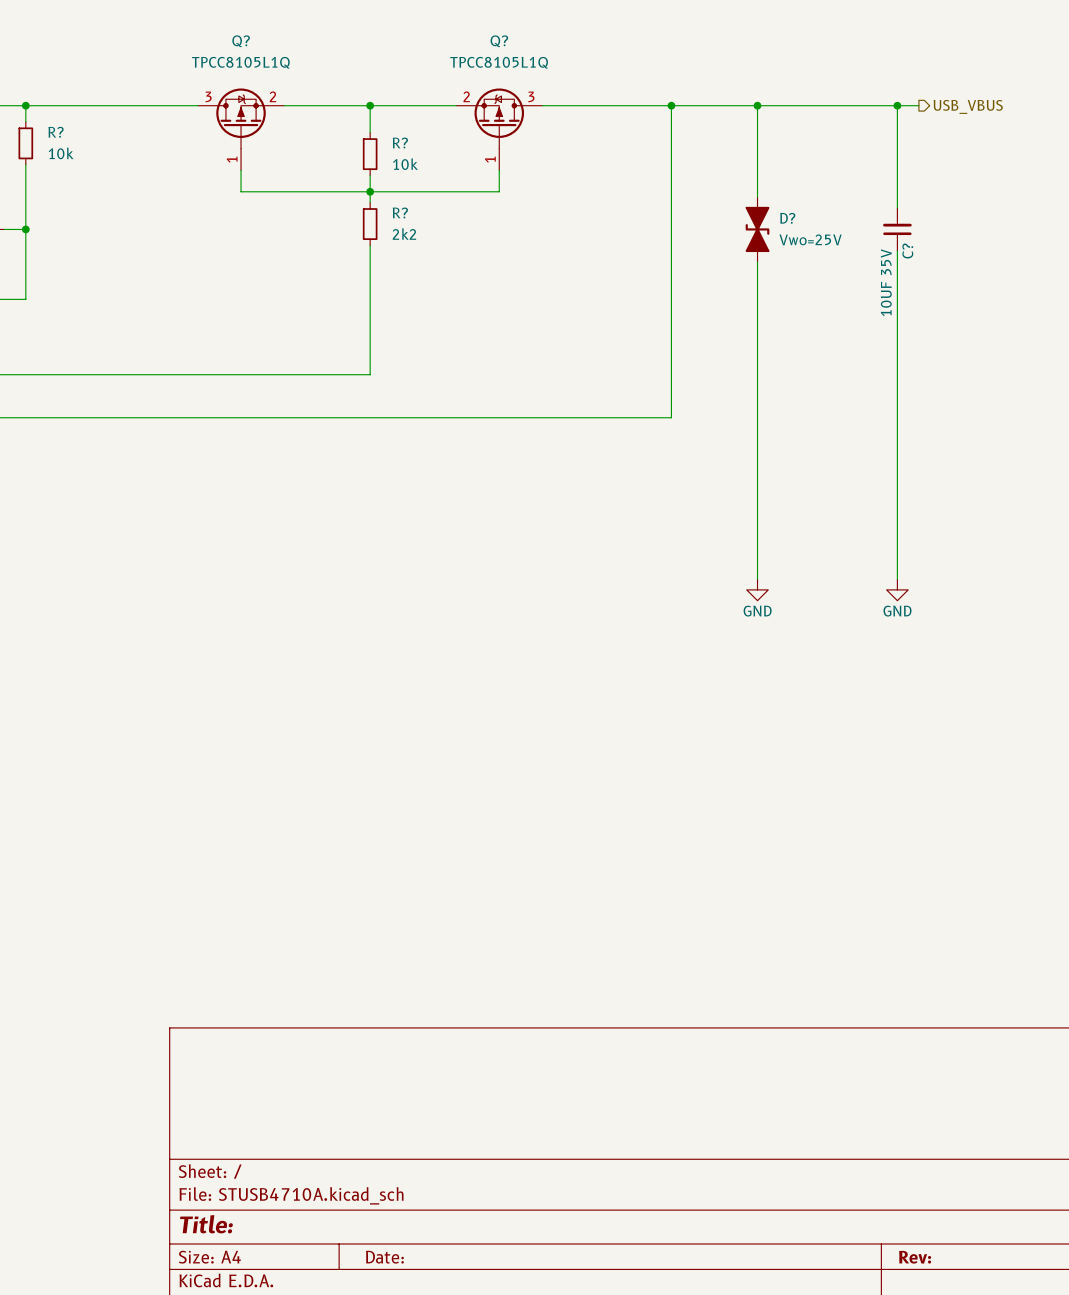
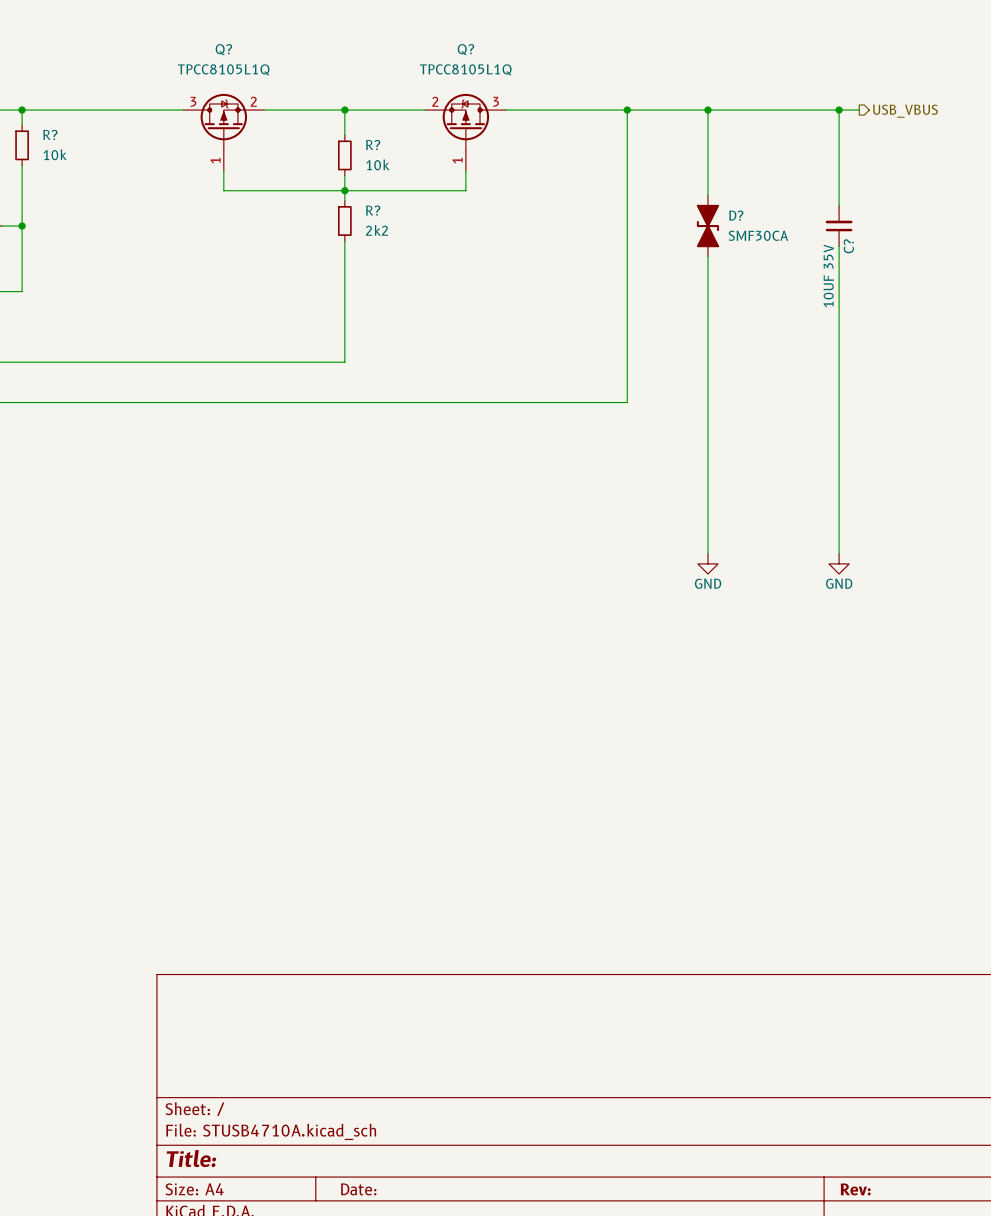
D? value: Vwo=25V (810, 239) -> SMF30CA (758, 235)

